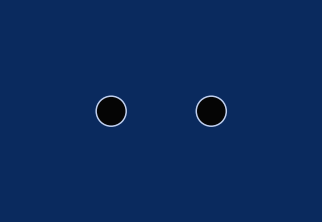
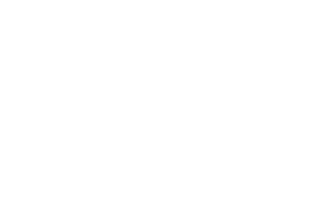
part: (161, 111) -> none

